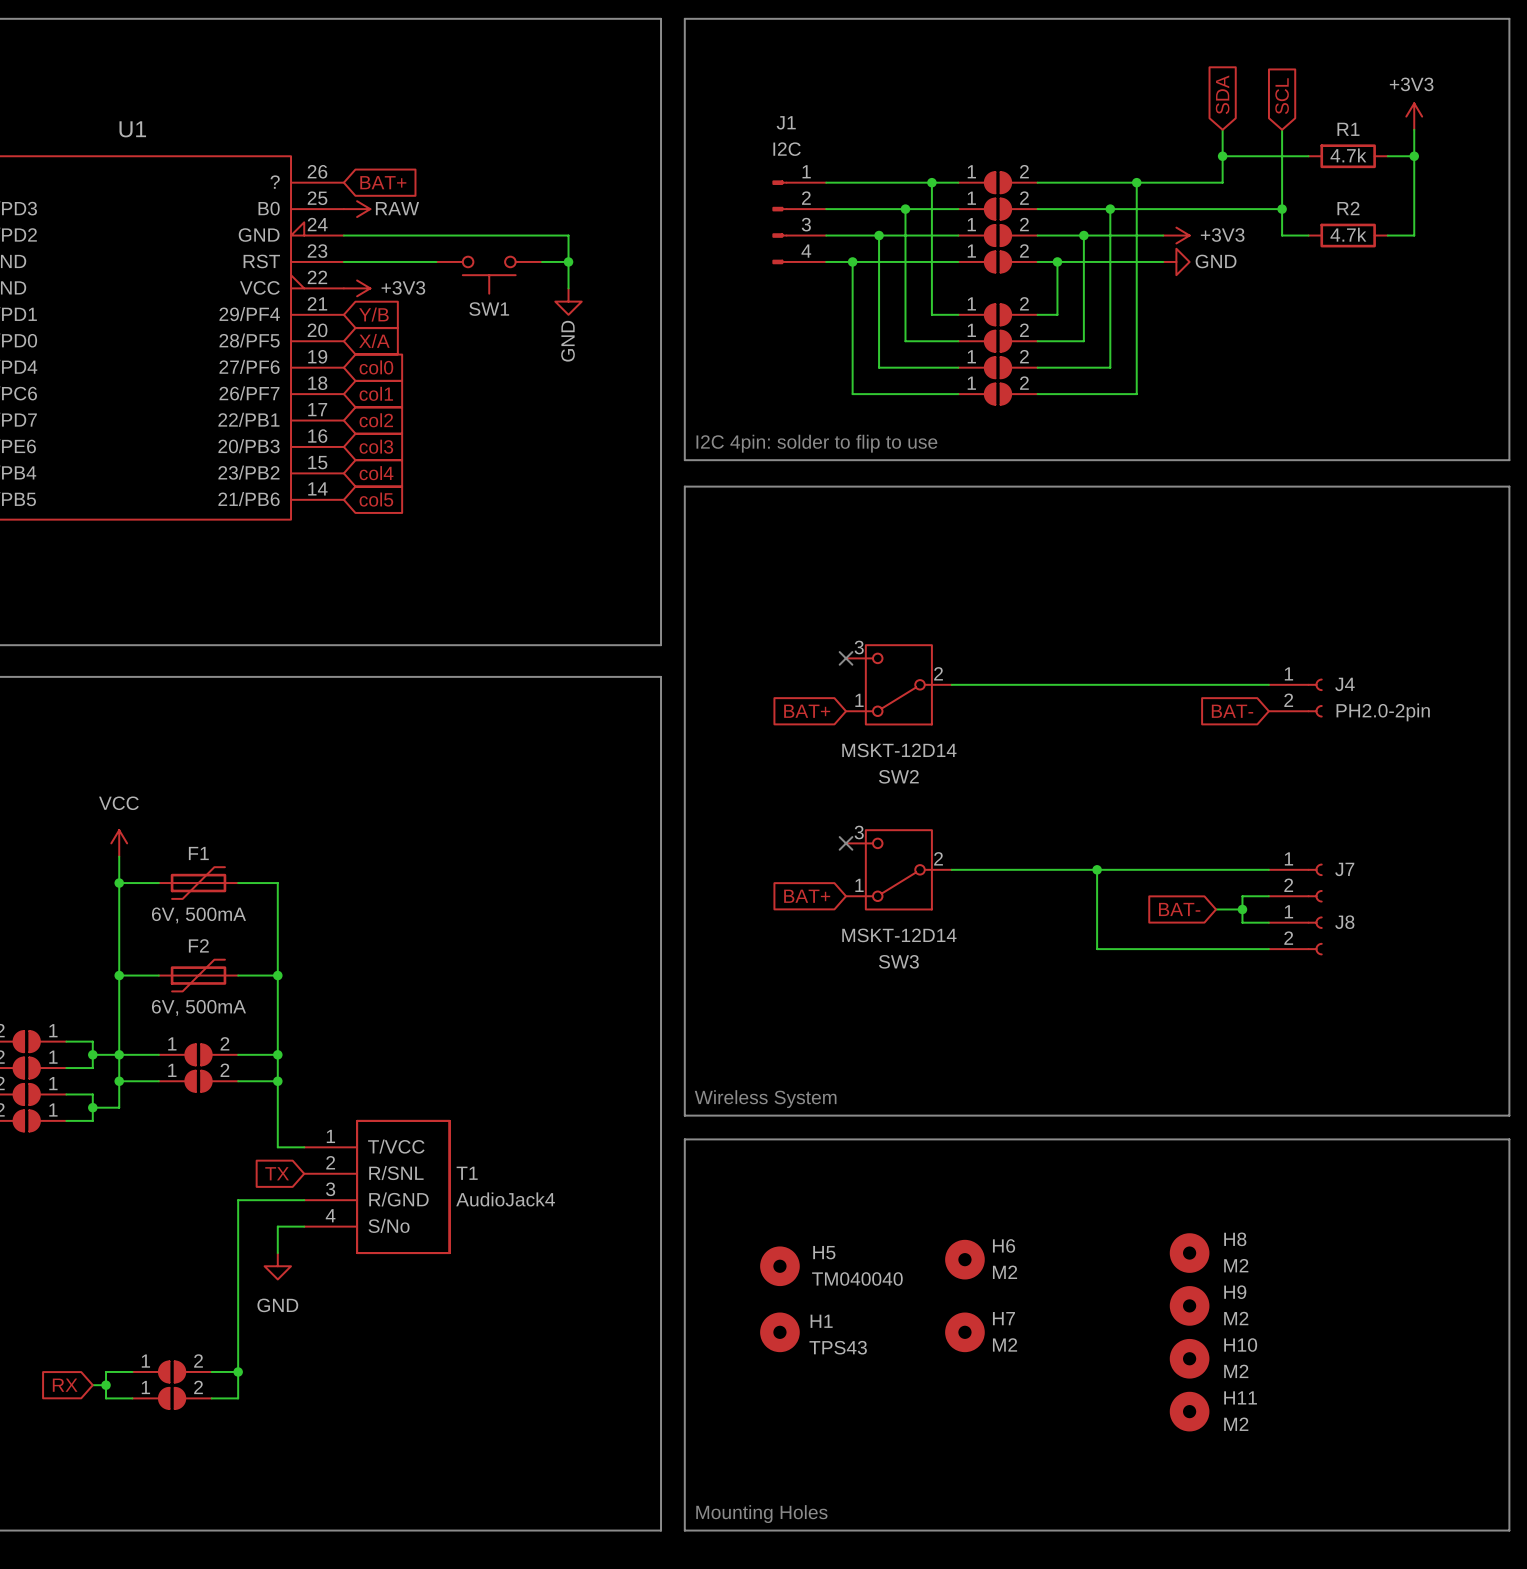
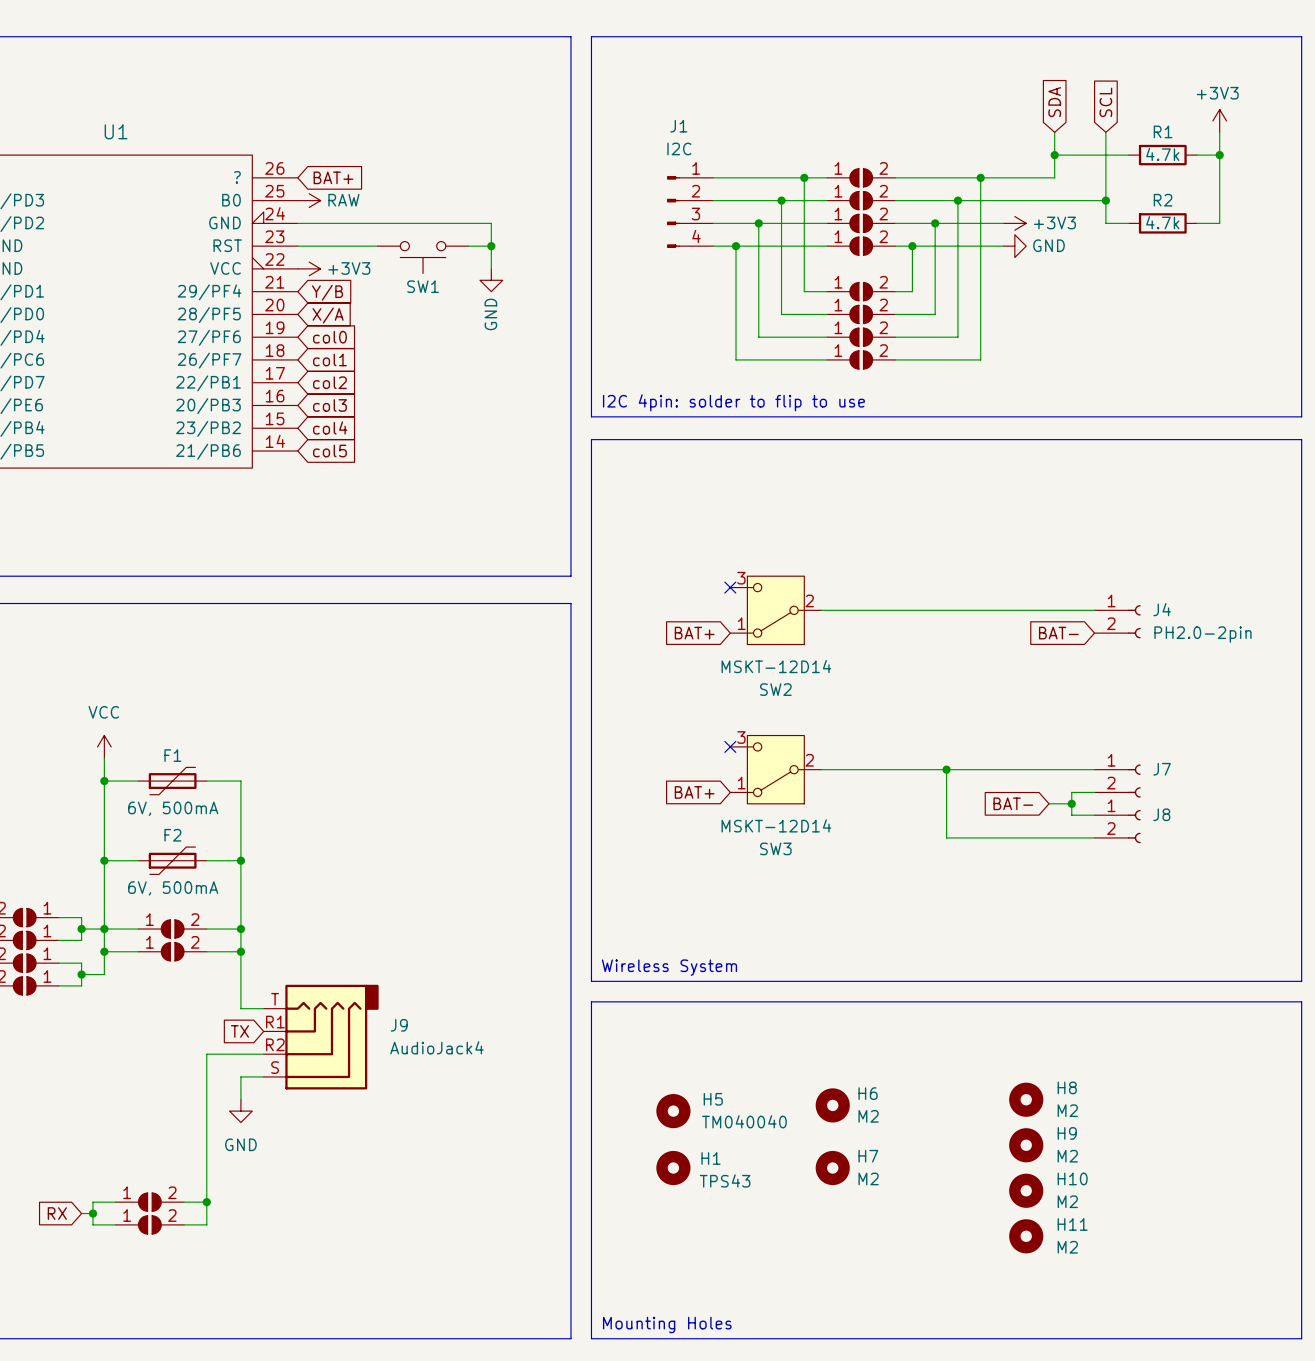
J9: none -> AudioJack4 (321, 1037)
T1: AudioJack4 (376, 1186) -> none

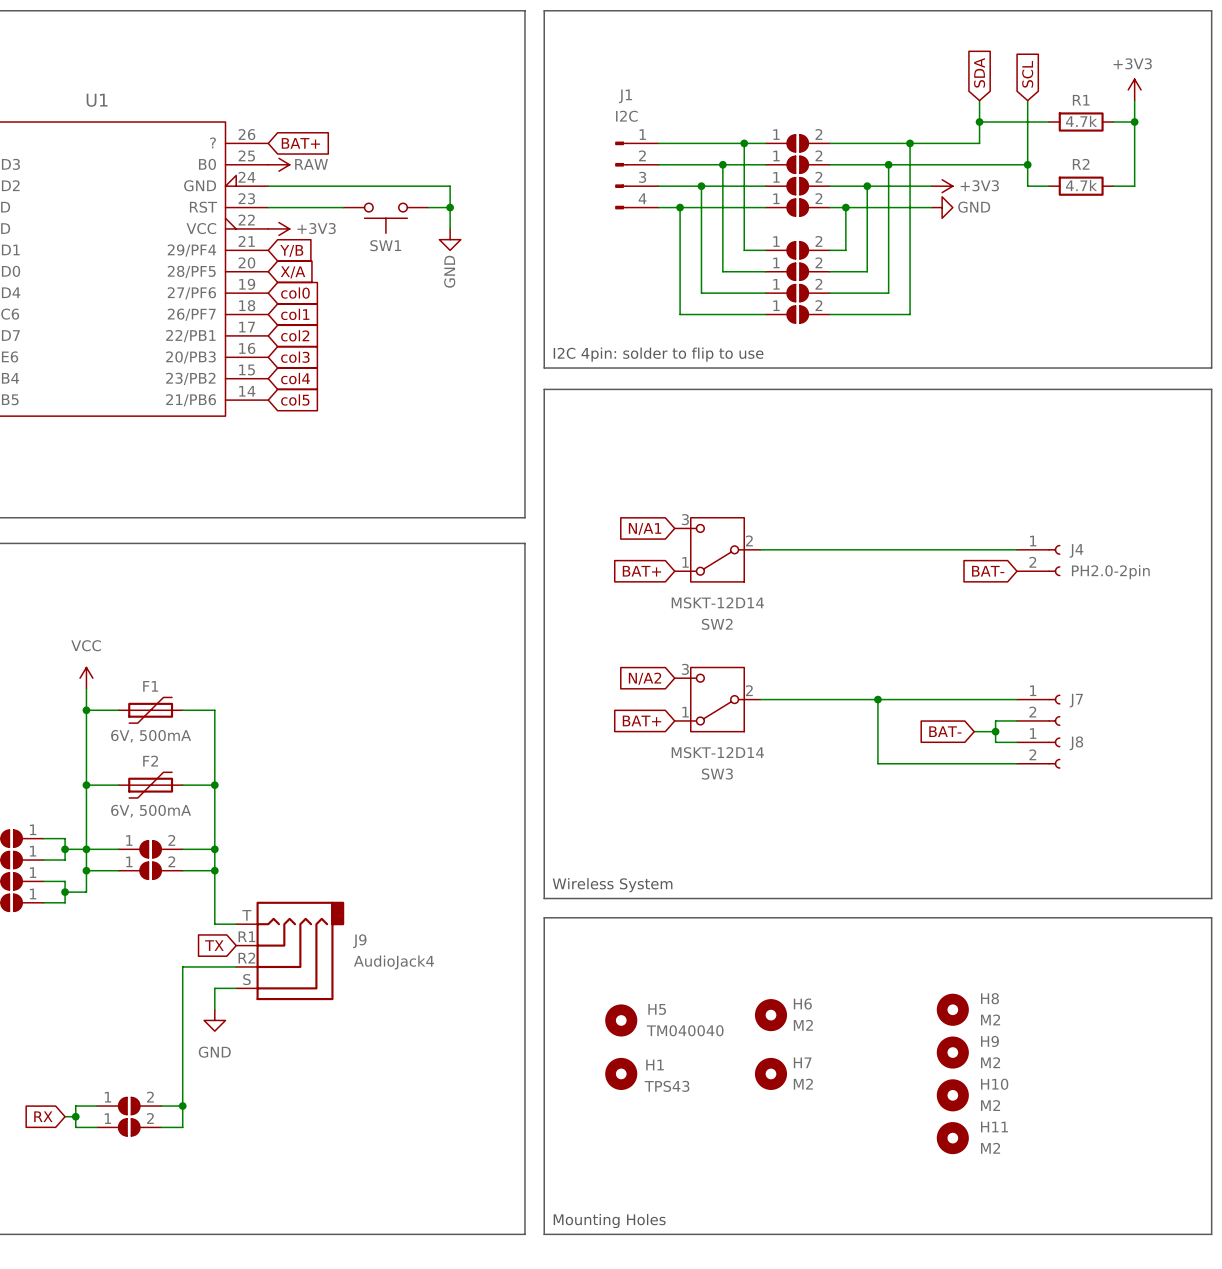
no-connect mark: (730, 587) -> none
global label: none -> N/A1 (645, 529)
no-connect mark: (730, 746) -> none
global label: none -> N/A2 (645, 678)

